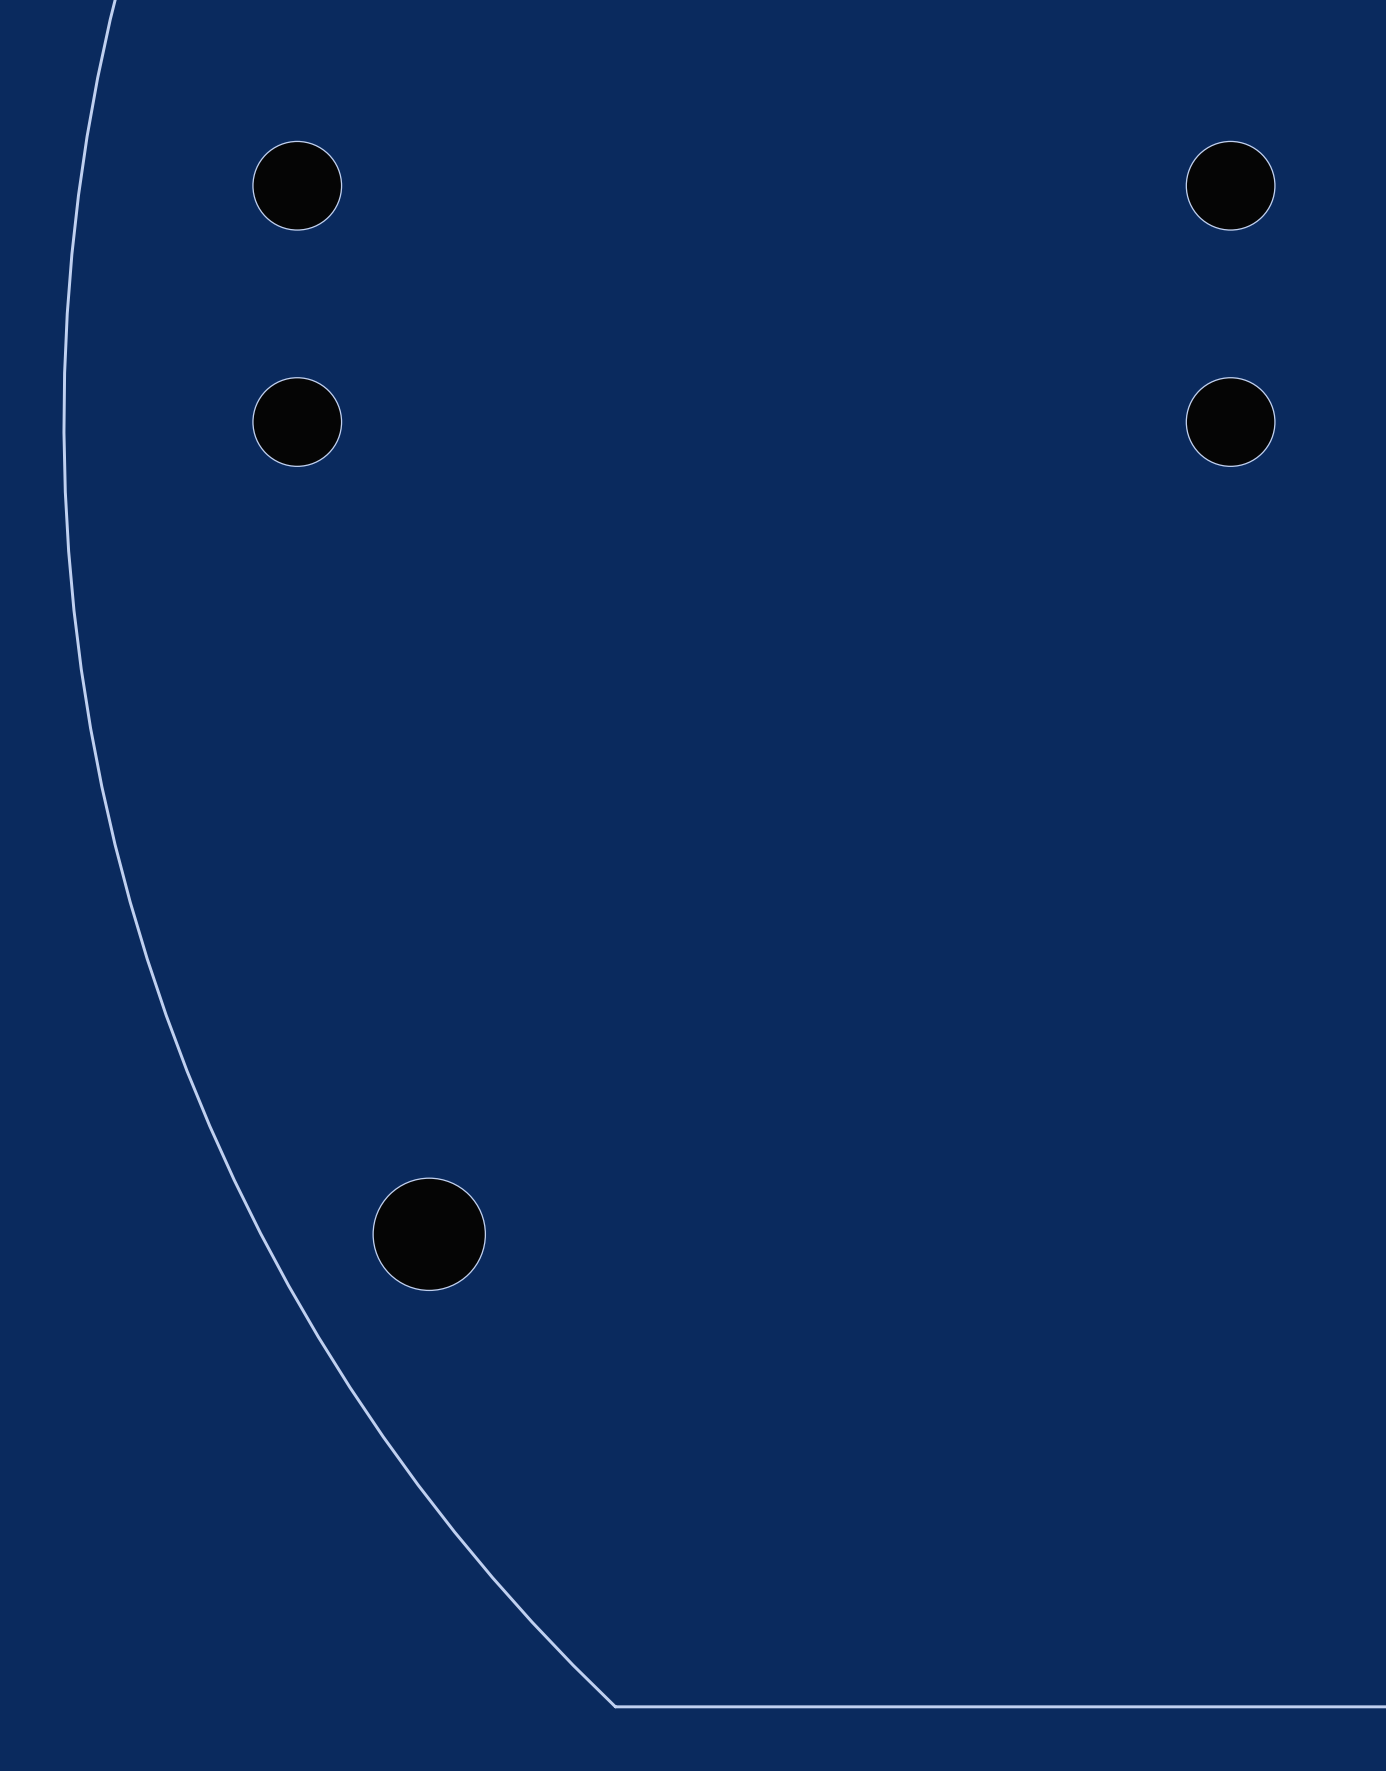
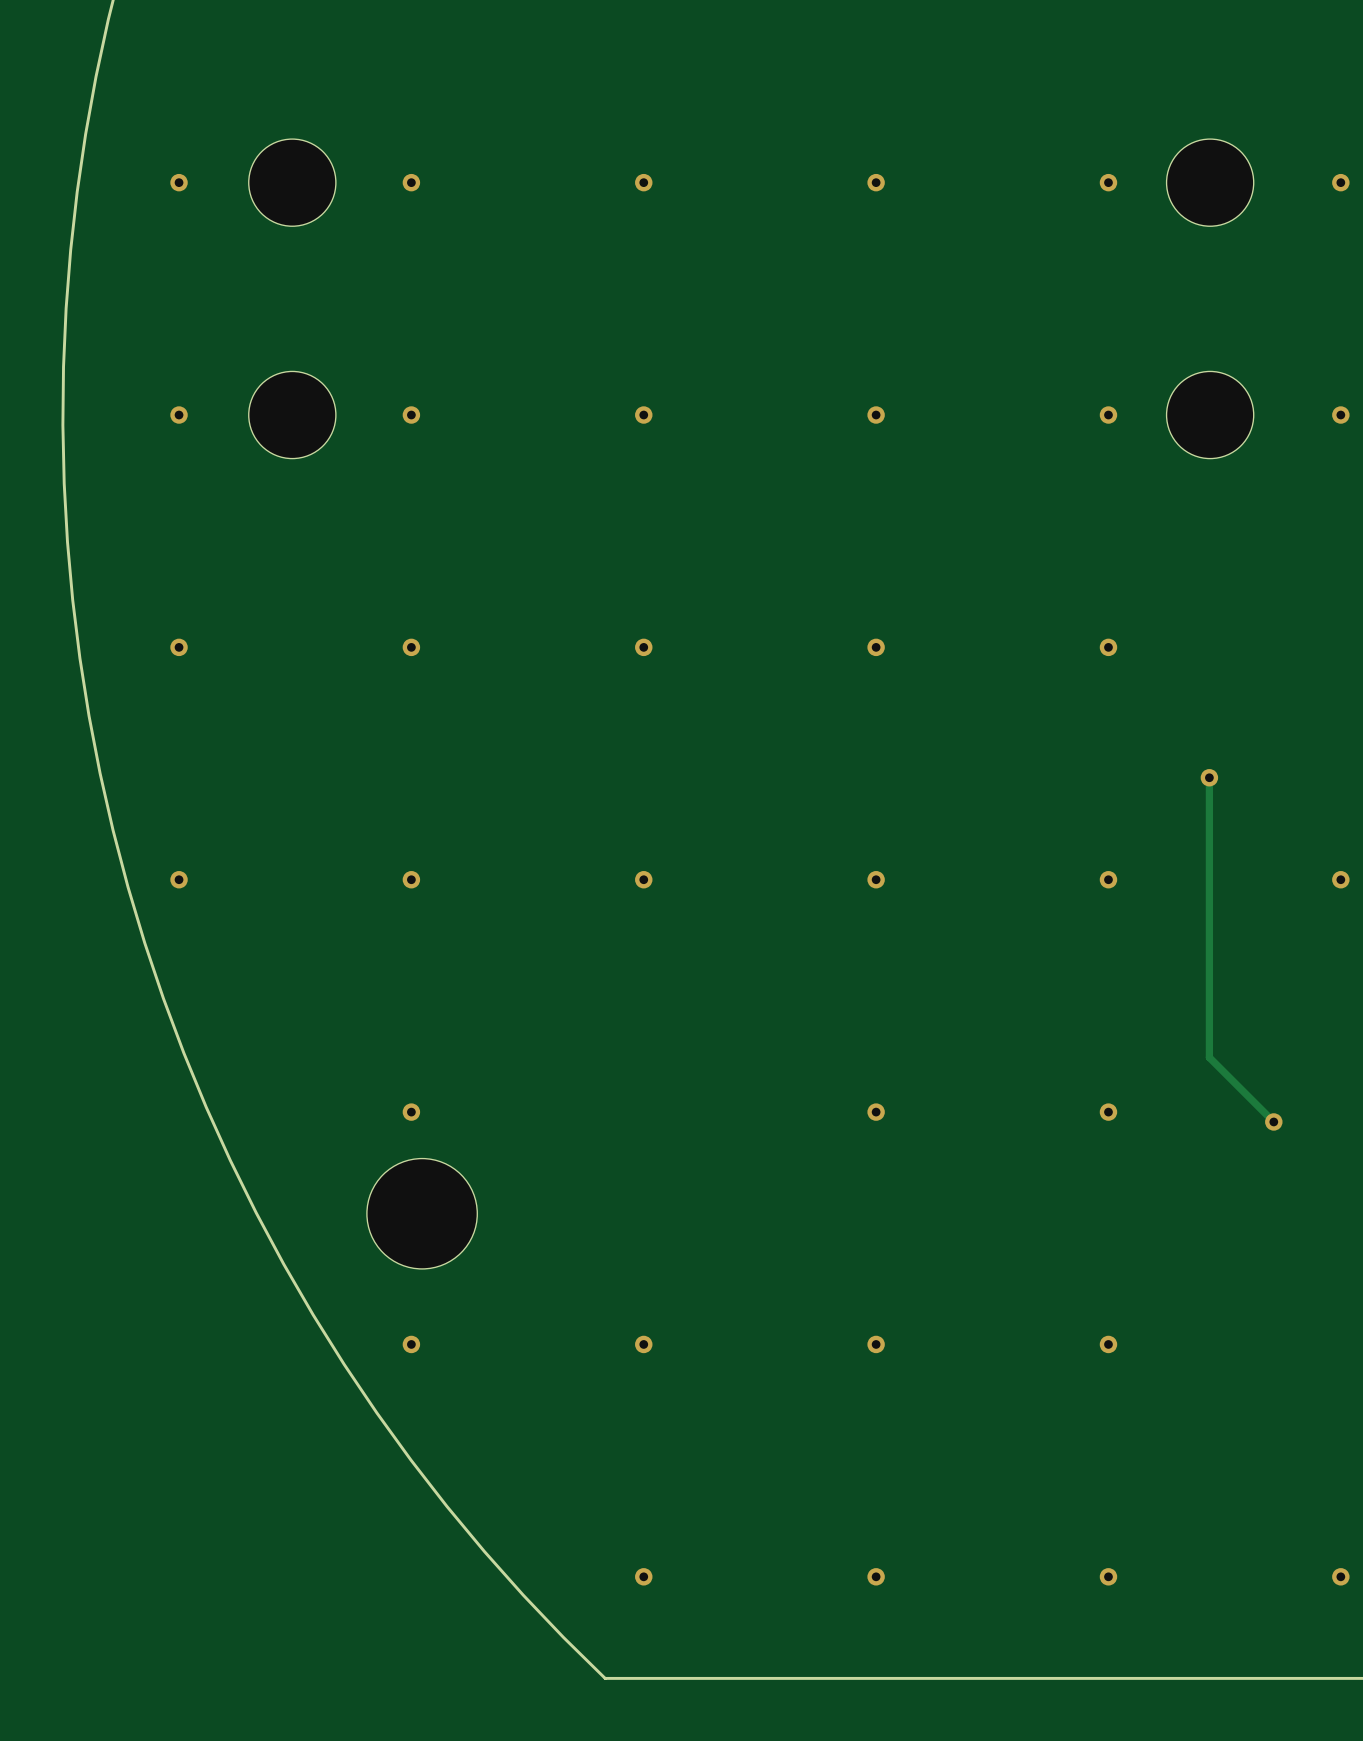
via: none -> (179, 182)
via: none -> (411, 182)
via: none -> (643, 182)
via: none -> (876, 182)
via: none -> (1108, 182)
via: none -> (1340, 182)
via: none -> (179, 415)
via: none -> (411, 415)
via: none -> (643, 415)
via: none -> (876, 415)
via: none -> (1108, 415)
via: none -> (1340, 415)
via: none -> (179, 647)
via: none -> (411, 647)
via: none -> (643, 647)
via: none -> (876, 647)
via: none -> (1108, 647)
track: none -> (1209, 777) (1209, 1057) (1273, 1121)
via: none -> (1209, 777)
via: none -> (179, 879)
via: none -> (411, 879)
via: none -> (643, 879)
via: none -> (876, 879)
via: none -> (1108, 879)
via: none -> (1340, 879)
via: none -> (411, 1112)
via: none -> (876, 1112)
via: none -> (1108, 1112)
via: none -> (1273, 1121)
via: none -> (411, 1344)
via: none -> (643, 1344)
via: none -> (876, 1344)
via: none -> (1108, 1344)
via: none -> (643, 1576)
via: none -> (876, 1576)
via: none -> (1108, 1576)
via: none -> (1340, 1576)

